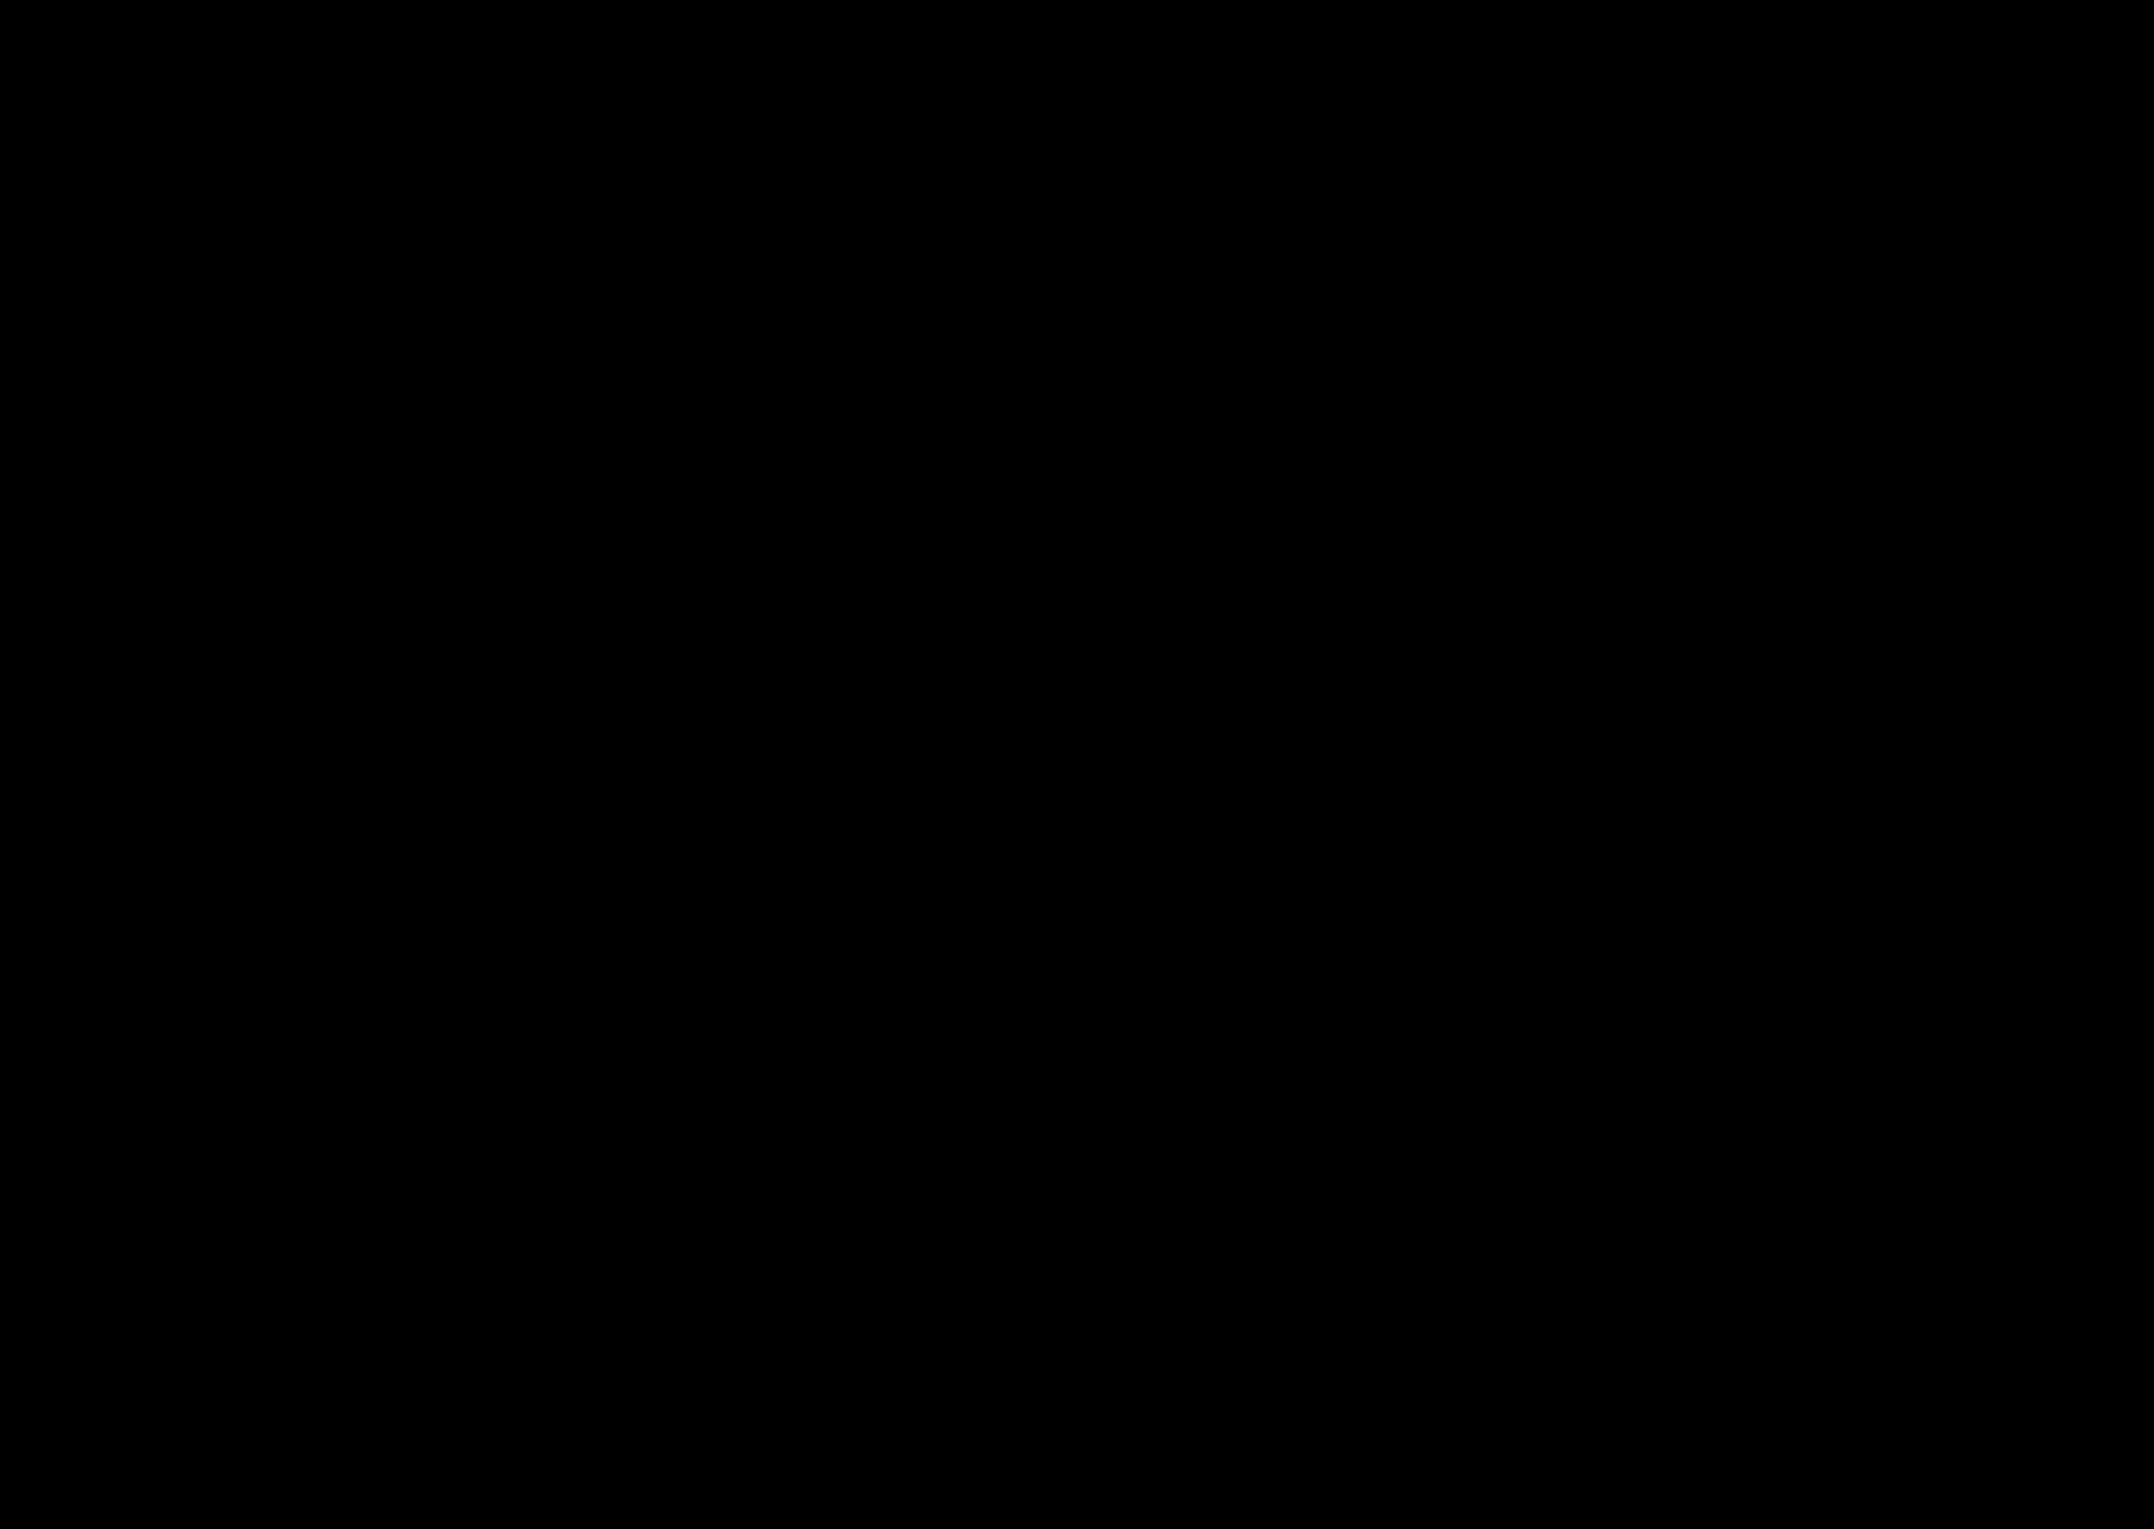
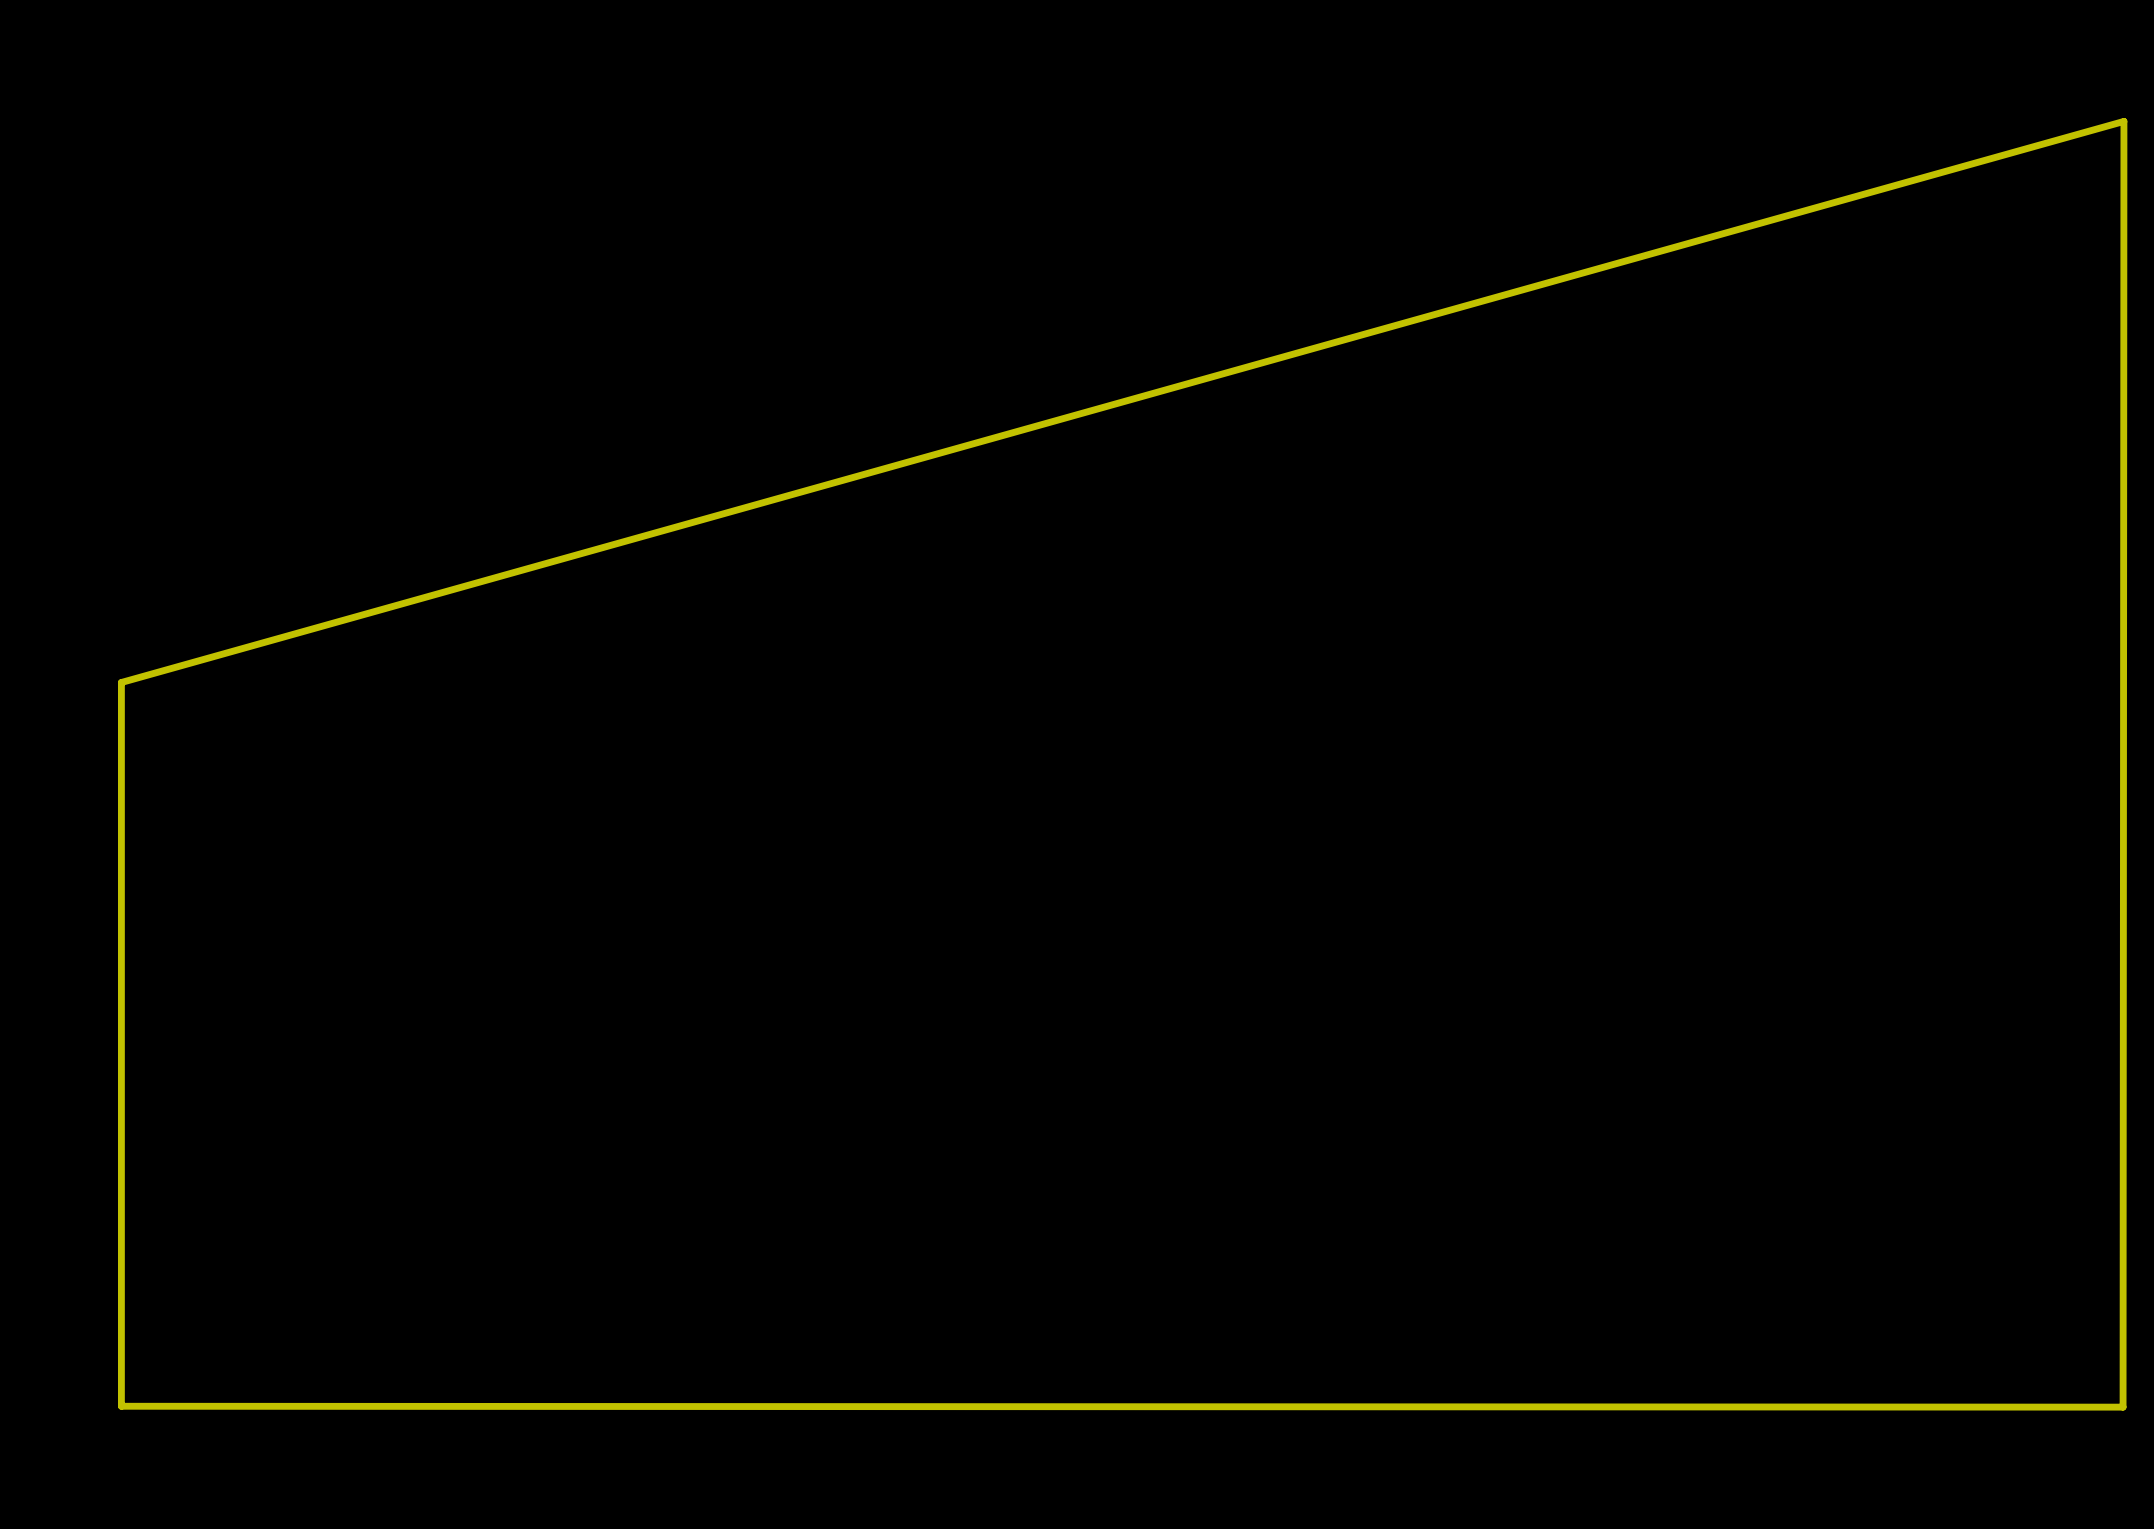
board edge: none -> (2123, 121) (2123, 1407) (121, 1406) (121, 682) (2123, 121)

